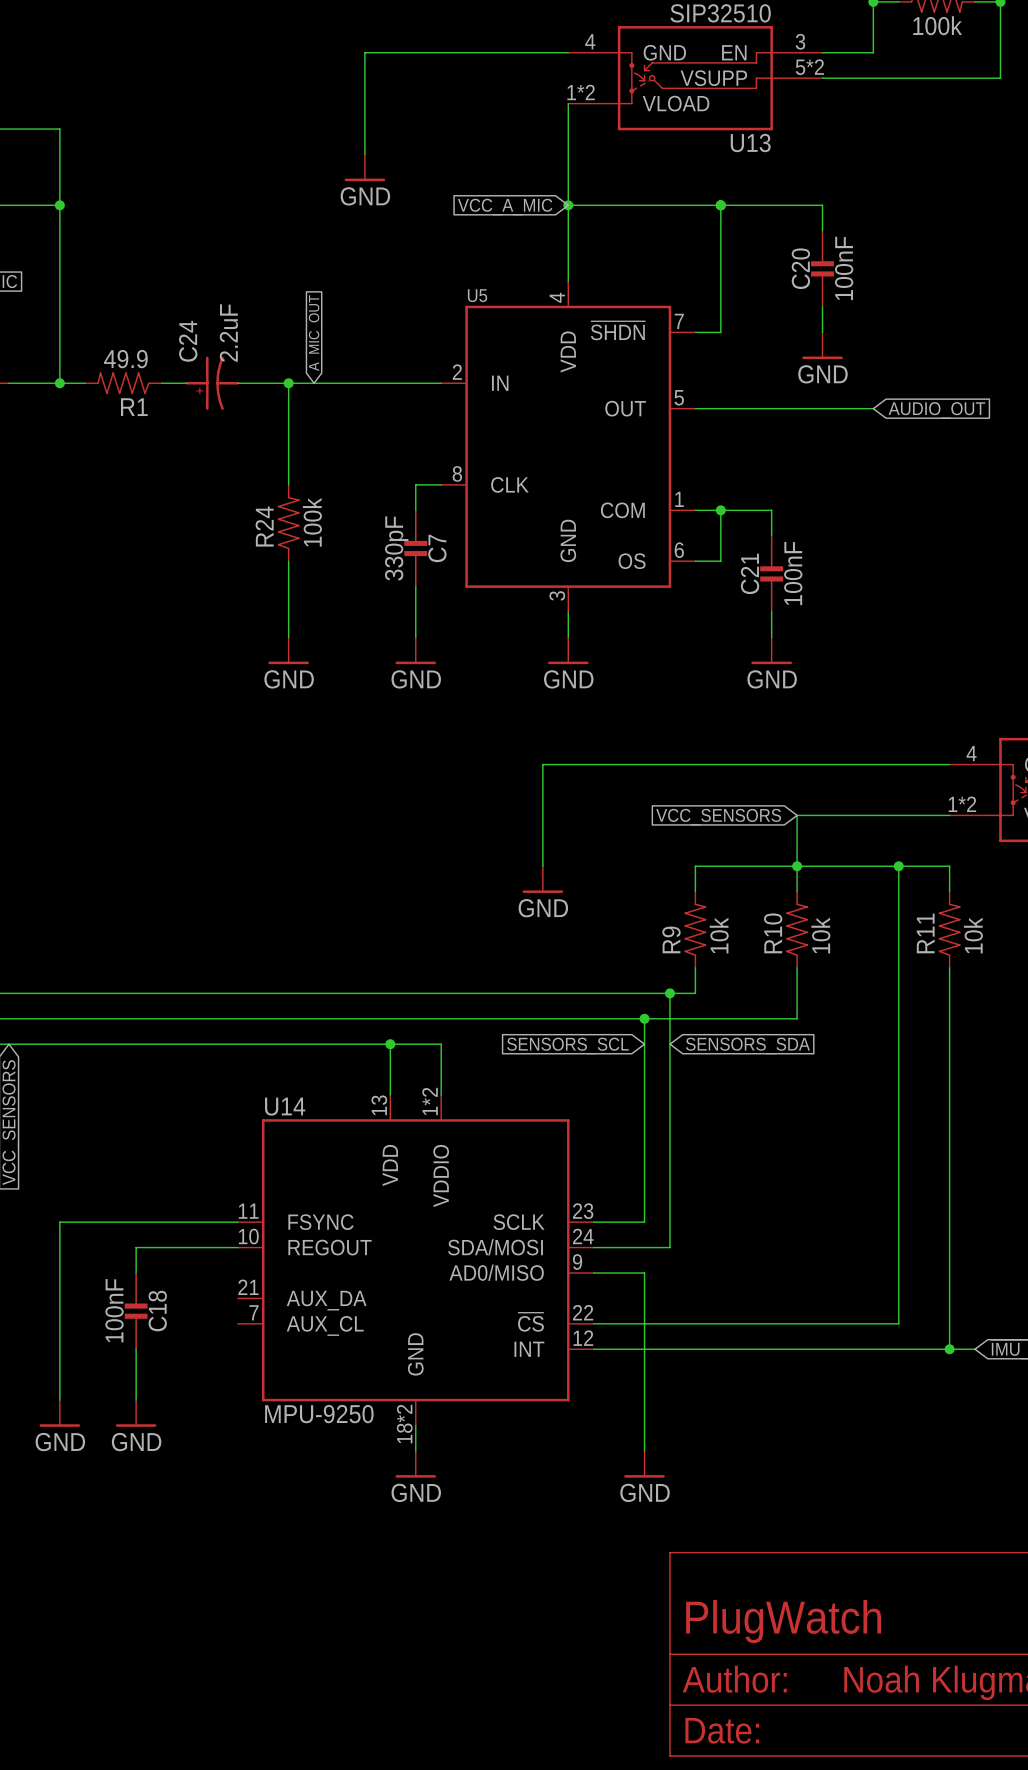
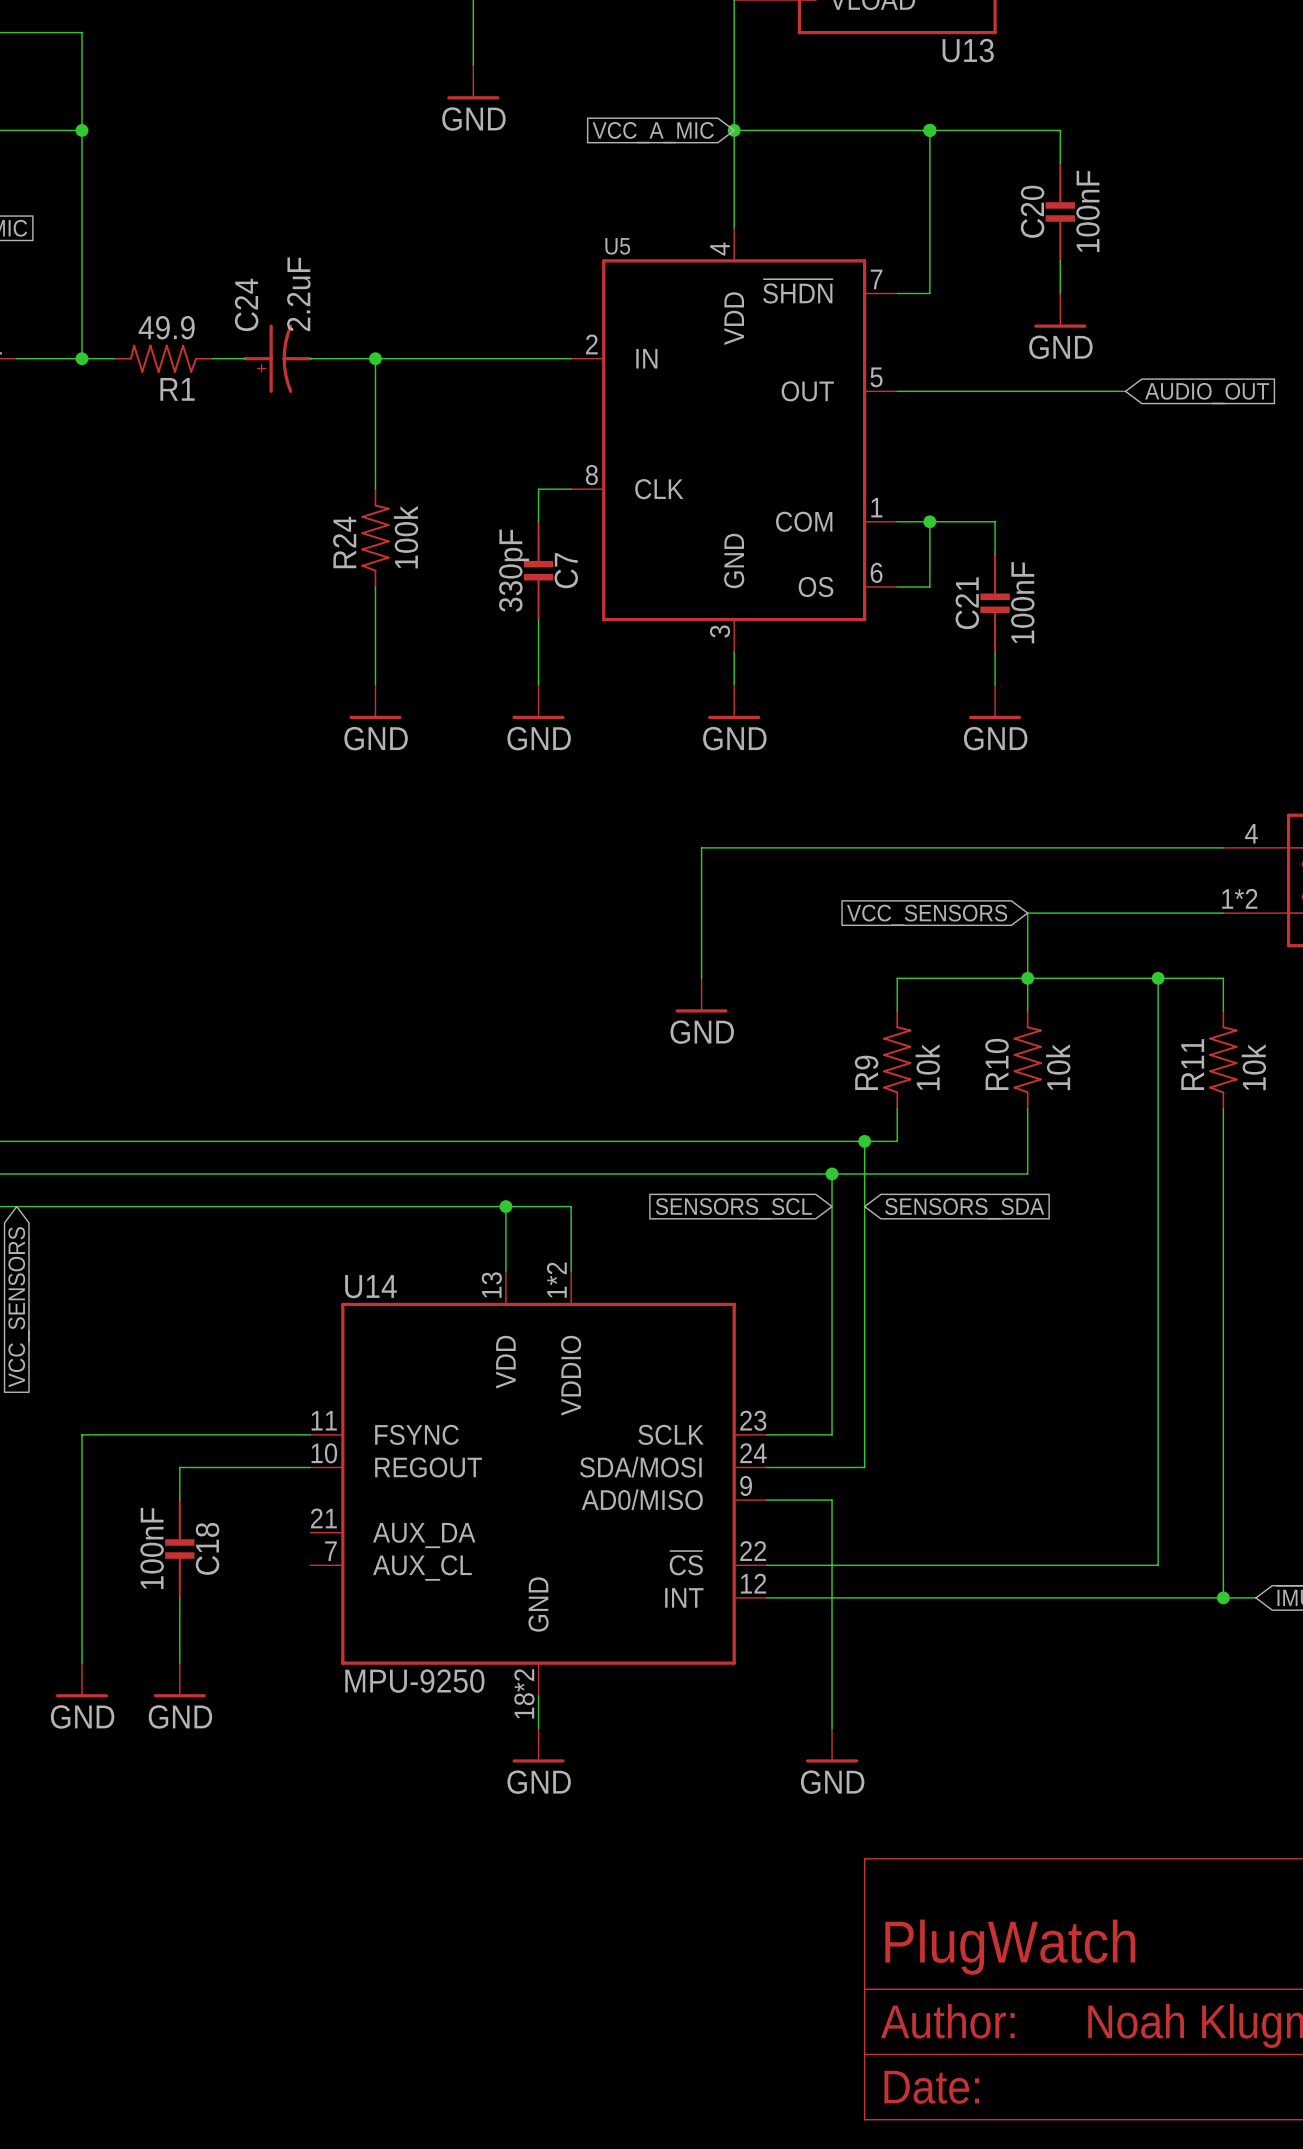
global label: A_MIC_OUT (315, 333) -> none

